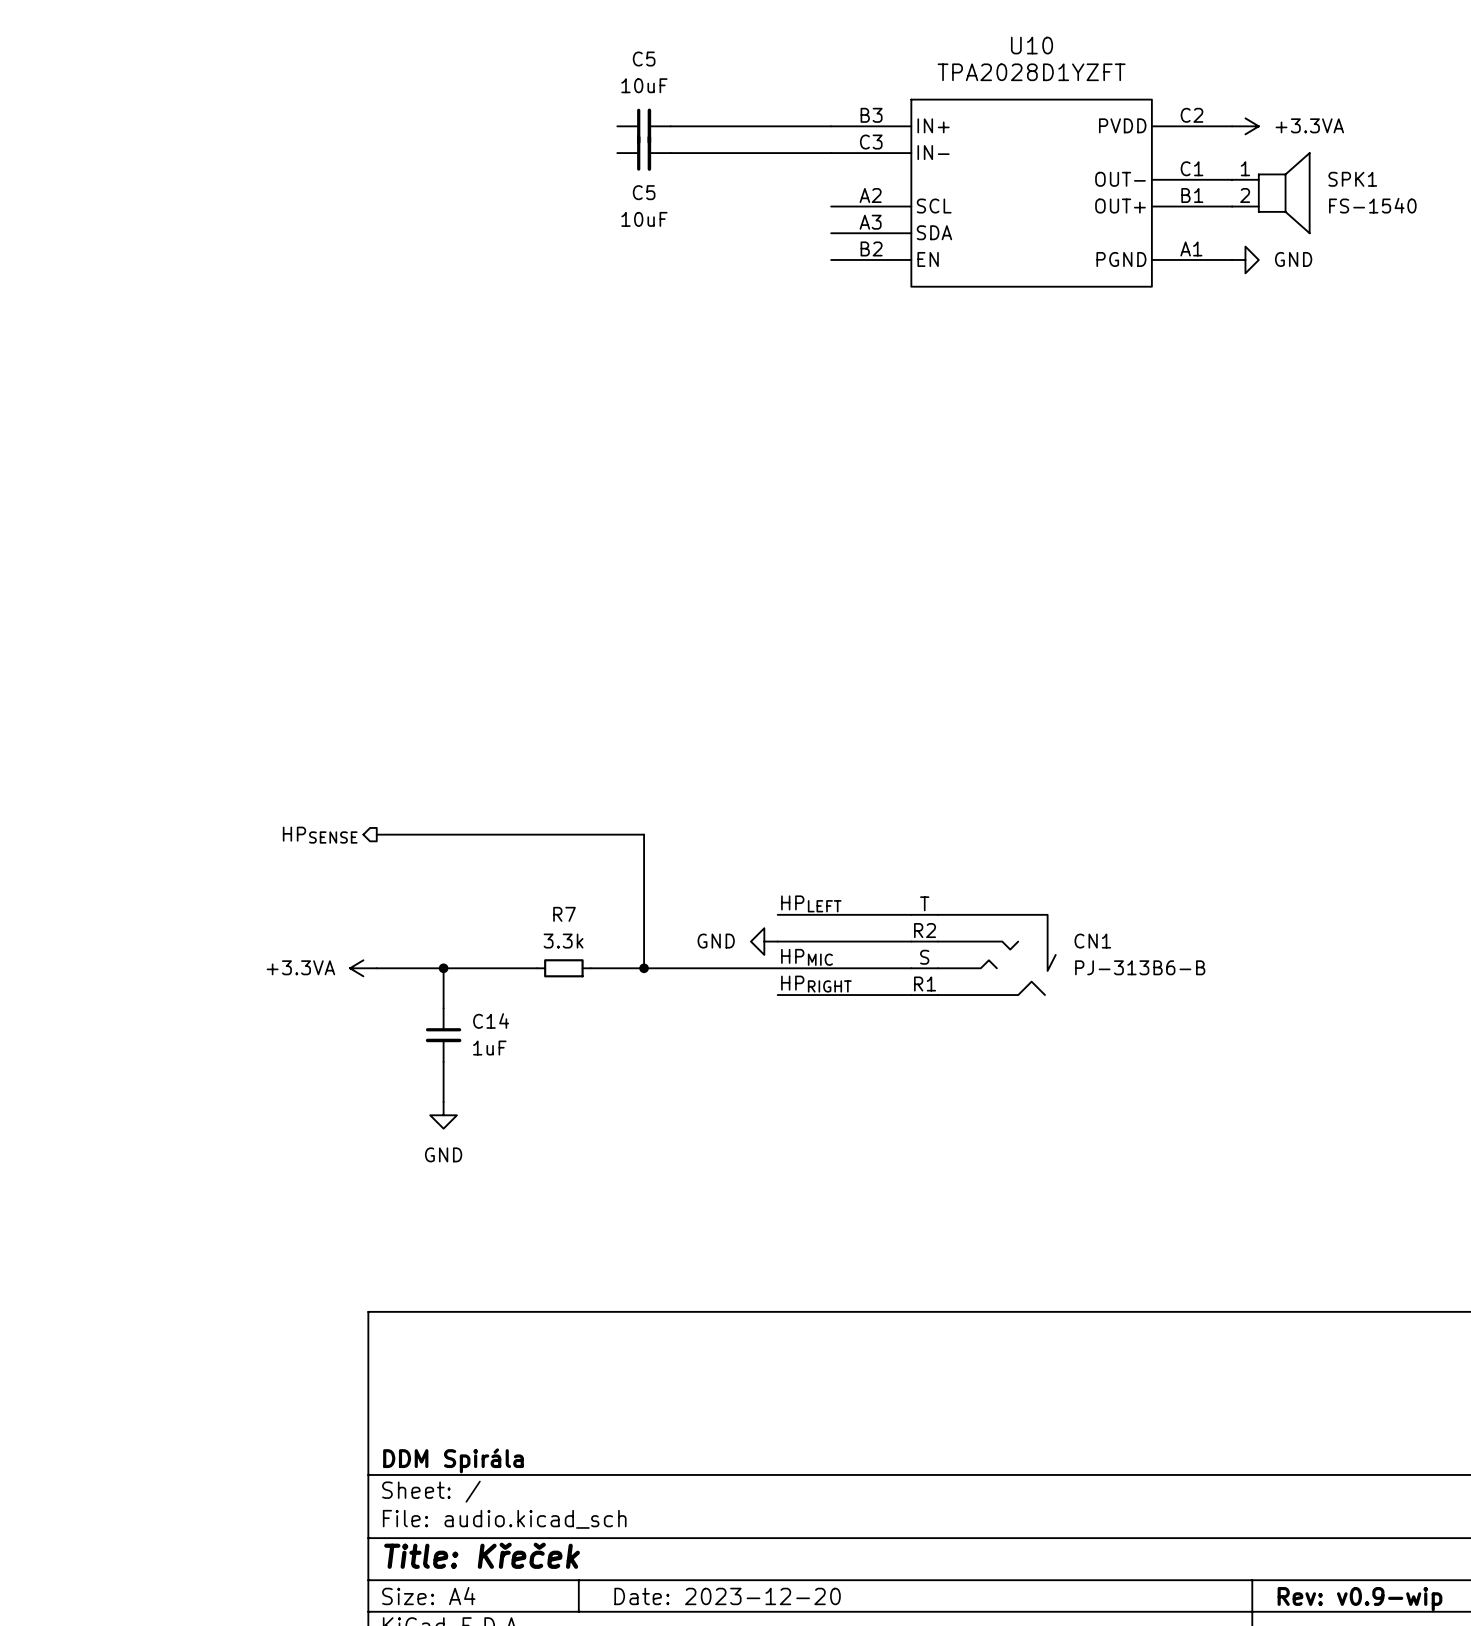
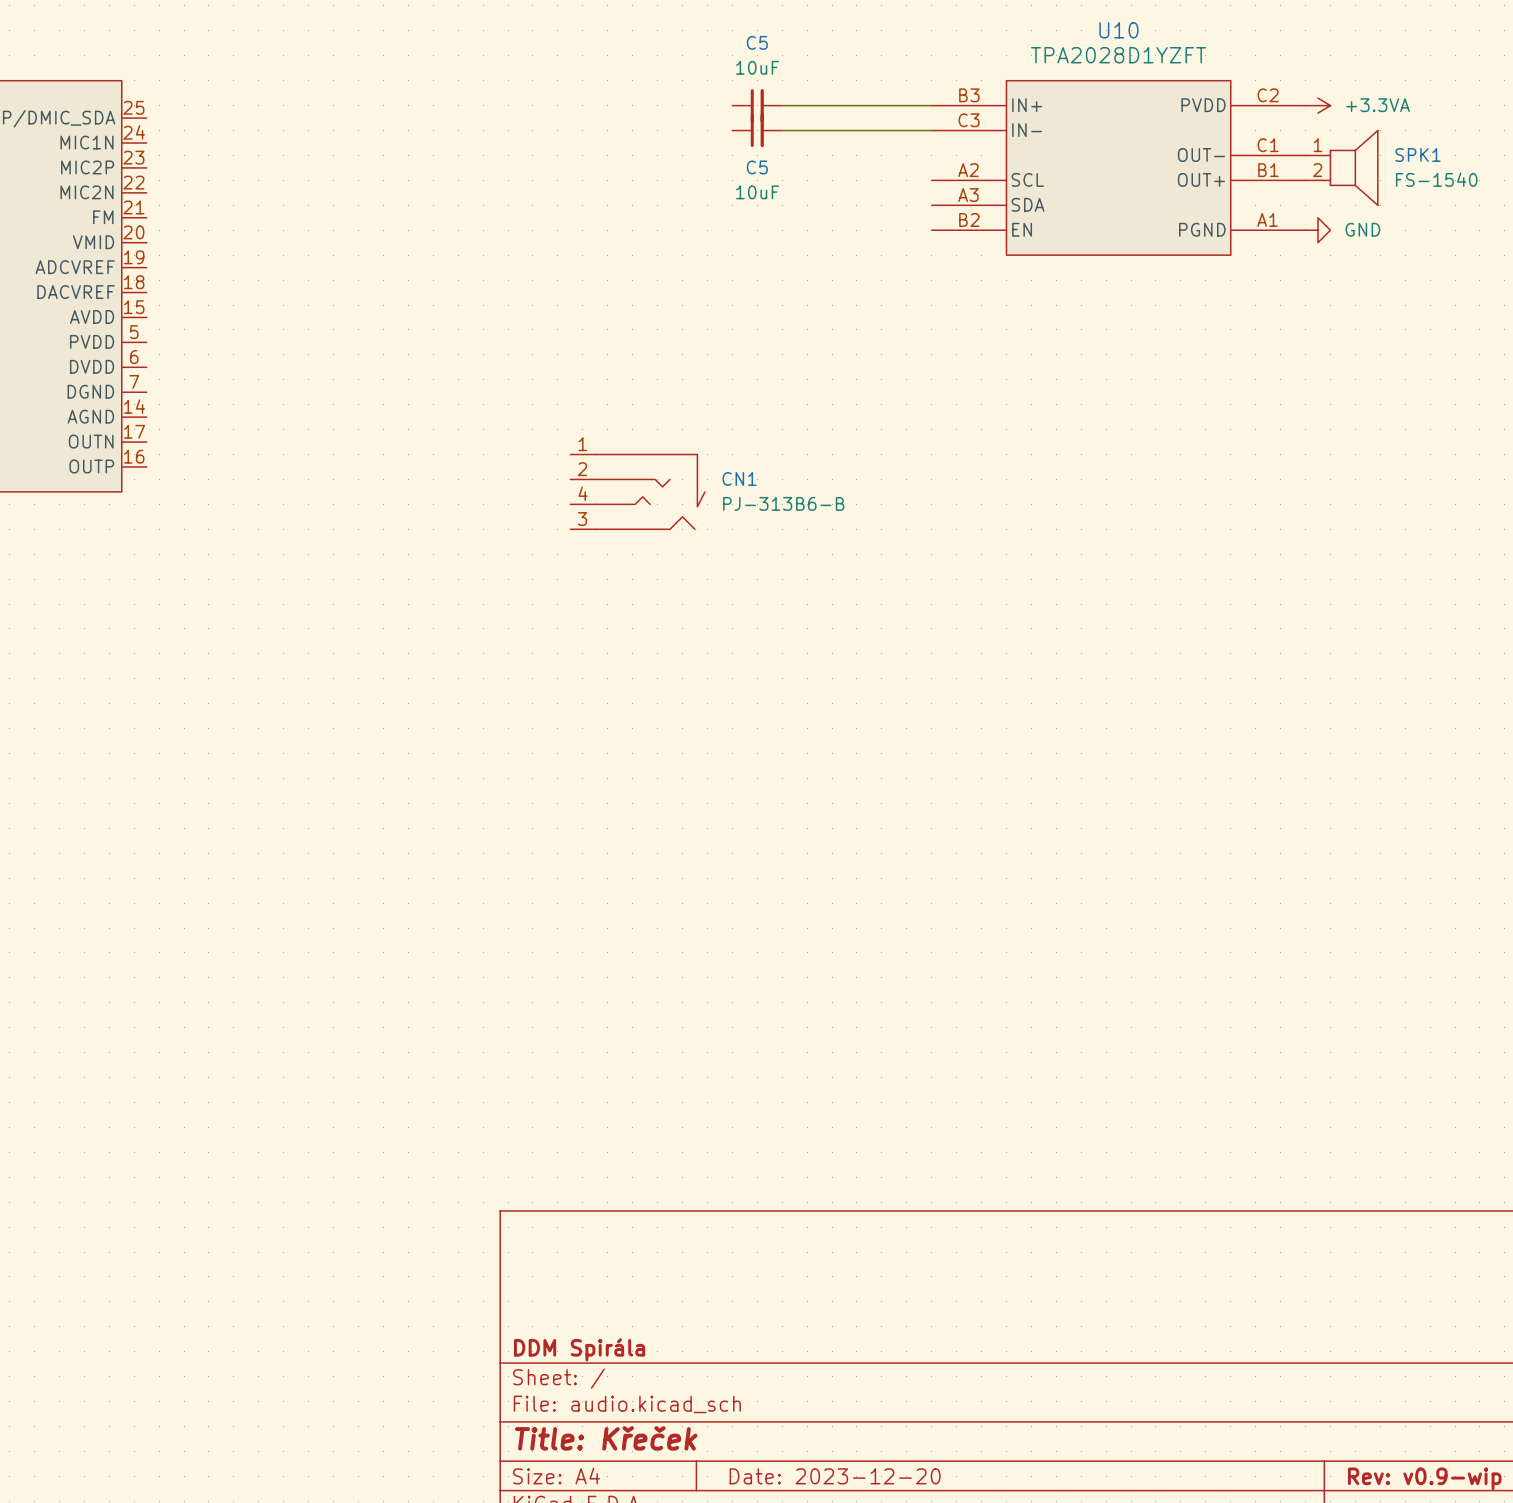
wire: (376, 834) (644, 834) (644, 968) -> none
hierarchical label: HPSENSE (320, 835) -> none
label: HPLEFT (811, 903) -> none
CN1 pin number: T (924, 903) -> 1 (582, 444)
wire: (777, 914) (911, 914) -> none
CN1 pin number: R2 (925, 930) -> 2 (582, 469)
power symbol: GND (764, 941) -> none
wire: (777, 941) (911, 941) -> none
CN1 position: (983, 954) -> (637, 491)
label: HPMIC (807, 957) -> none
CN1 pin number: S (924, 957) -> 4 (583, 493)
power symbol: +3.3VA (363, 968) -> none
wire: (376, 968) (537, 968) -> none
wire: (443, 968) (443, 1008) -> none
junction: (443, 968) -> none
R7: 3.3k (563, 968) -> none
wire: (590, 968) (911, 968) -> none
junction: (644, 968) -> none
CN1 pin number: R1 (925, 983) -> 3 (582, 519)
label: HPRIGHT (816, 984) -> none
wire: (777, 995) (911, 995) -> none
C14: 1uF (443, 1035) -> none
wire: (443, 1061) (443, 1101) -> none
power symbol: GND (443, 1115) -> none

